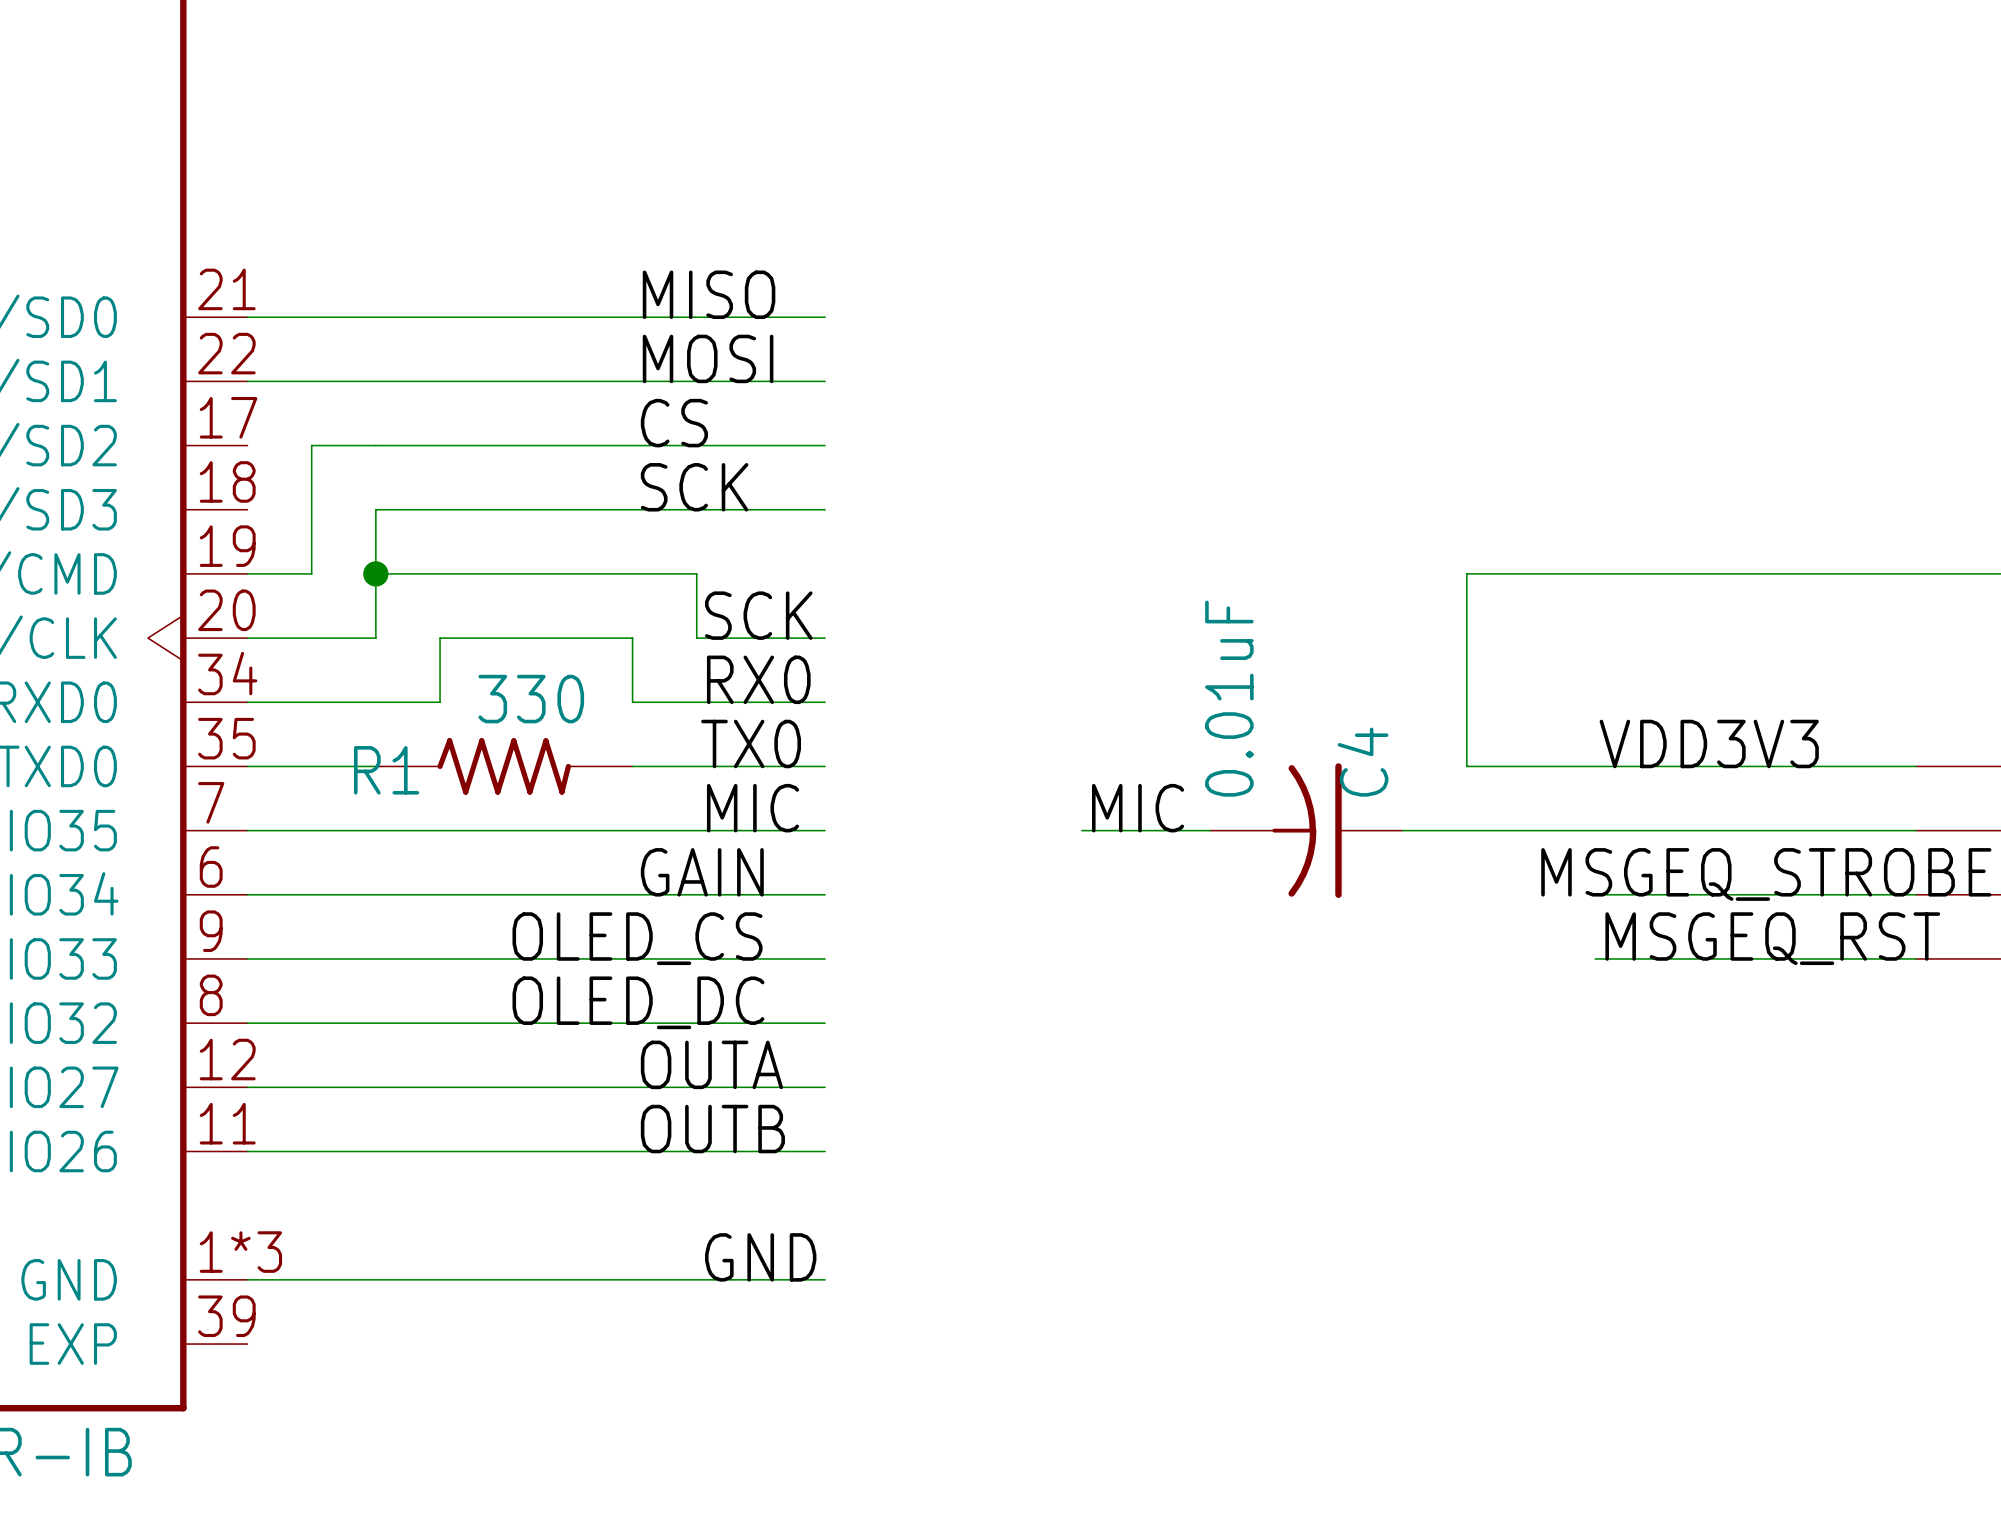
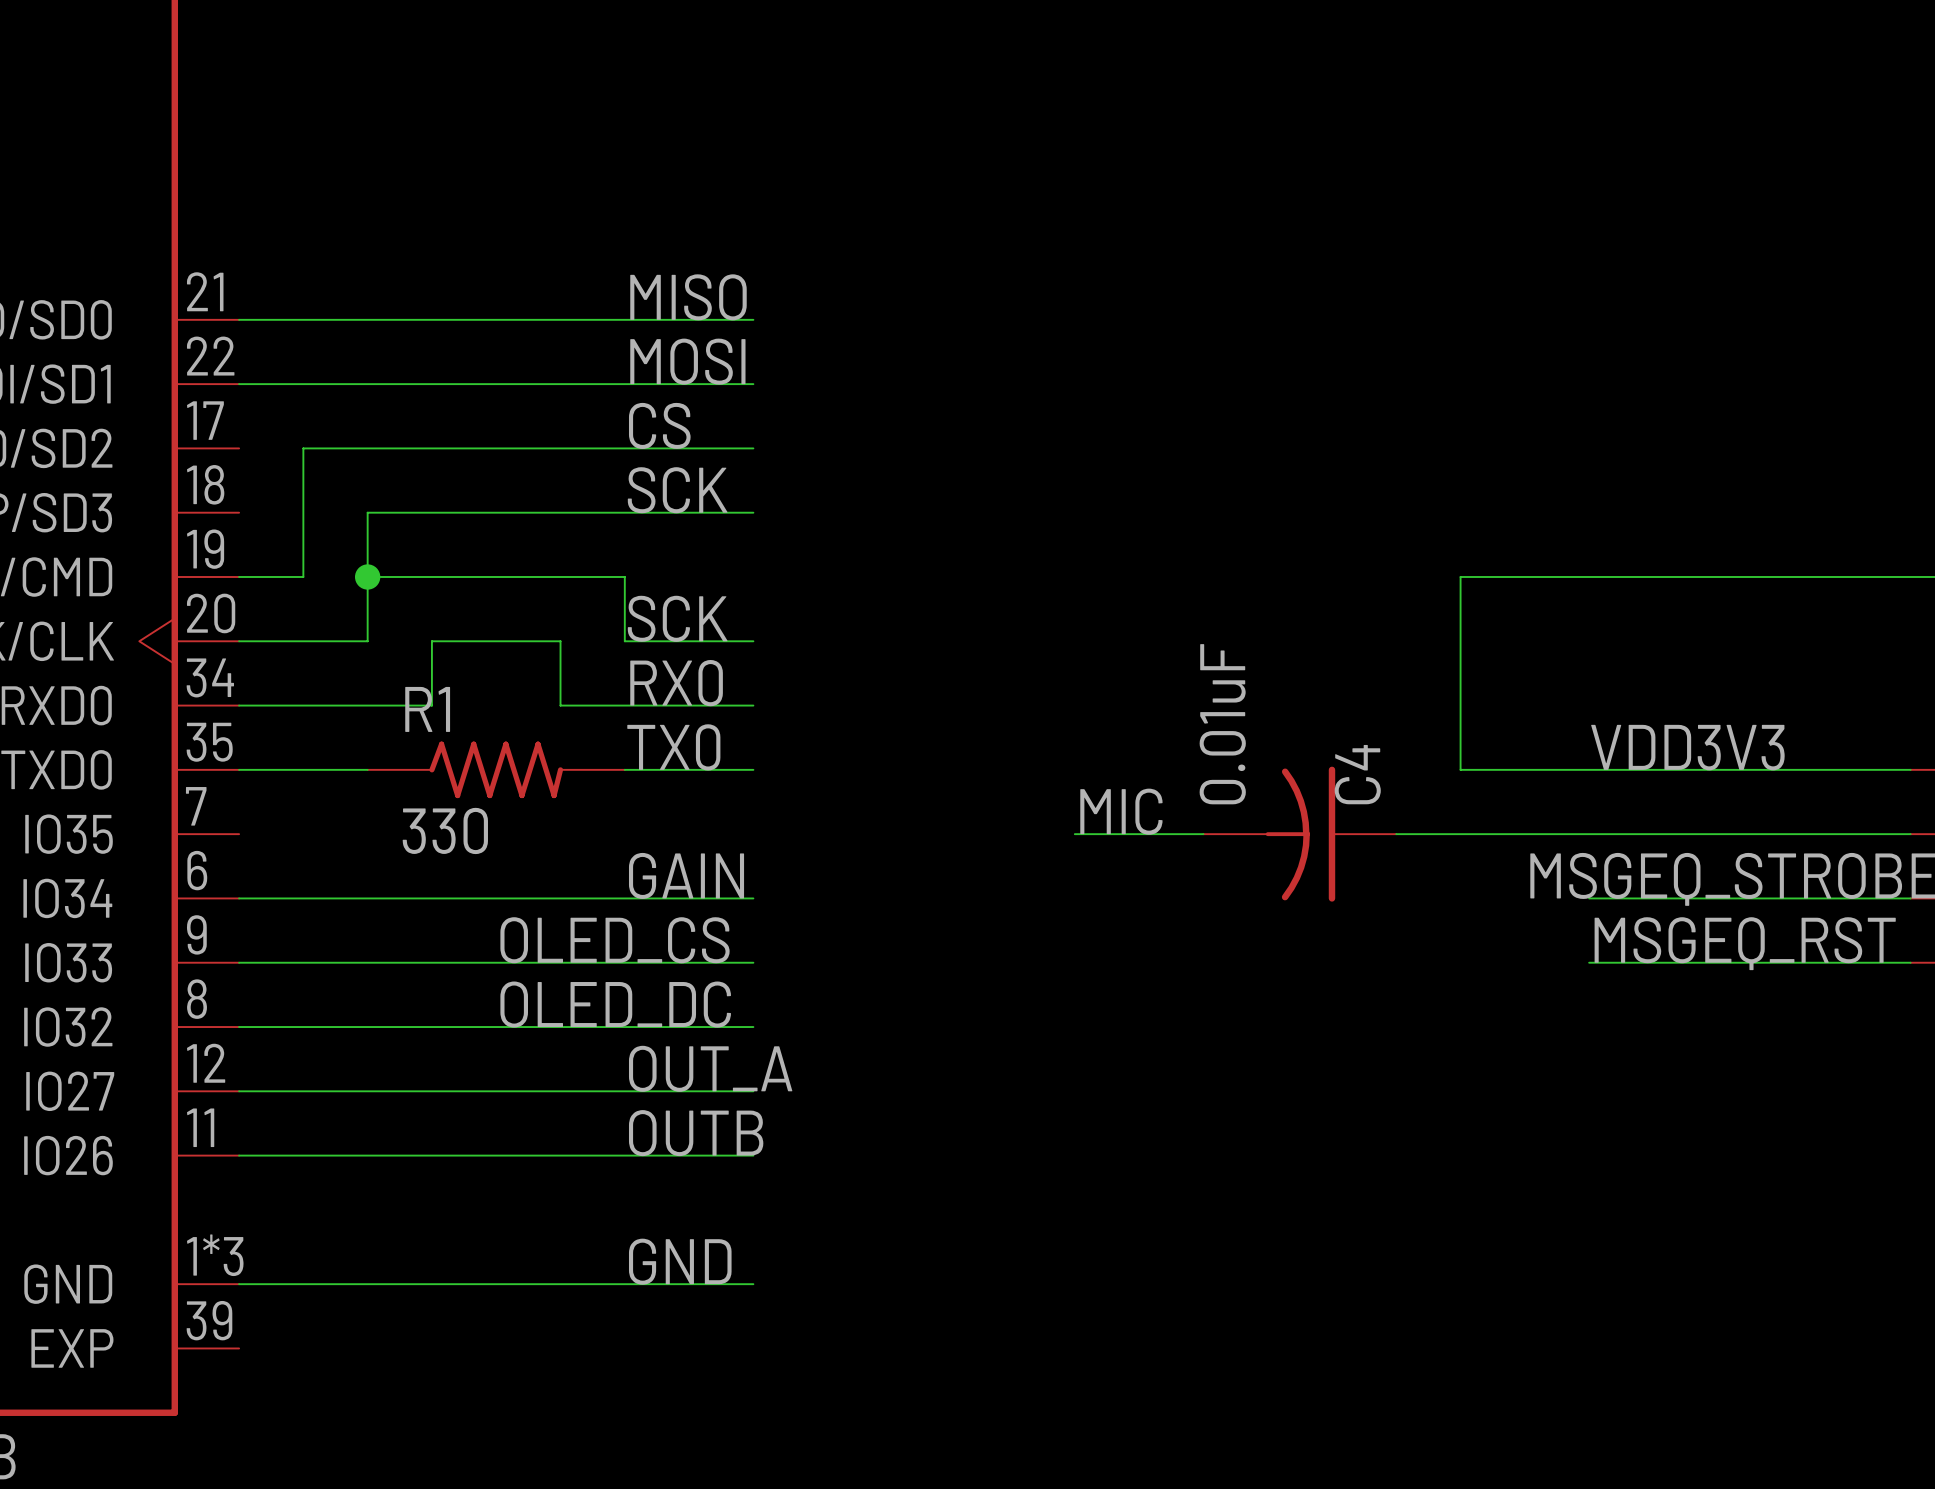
wire: (760, 317) (825, 317) -> none
wire: (760, 381) (825, 381) -> none
wire: (760, 445) (825, 445) -> none
wire: (760, 509) (825, 509) -> none
wire: (632, 573) (696, 573) (696, 638) -> (624, 576) (624, 641) (689, 641)
label position: SCK (758, 615) -> SCK (677, 618)
wire: (568, 638) (632, 638) (632, 702) -> (560, 641) (560, 705) (624, 705)
wire: (760, 638) (825, 638) -> none
label position: RX0 (758, 679) -> RX0 (676, 683)
R1 value position: 330 (531, 699) -> 330 (445, 830)
wire: (760, 702) (825, 702) -> none
label position: TX0 (751, 743) -> TX0 (673, 747)
wire: (760, 766) (825, 766) -> none
R1 name position: R1 (386, 770) -> R1 (427, 709)
label: MIC (753, 808) -> none
wire: (247, 830) (825, 830) -> none
wire: (760, 894) (825, 894) -> none
wire: (760, 958) (825, 958) -> none
wire: (760, 1023) (825, 1023) -> none
label: OUTA (711, 1064) -> OUT_A (710, 1068)
wire: (760, 1087) (825, 1087) -> none
wire: (760, 1151) (825, 1151) -> none
label position: GND (760, 1257) -> GND (680, 1261)
wire: (760, 1279) (825, 1279) -> none

